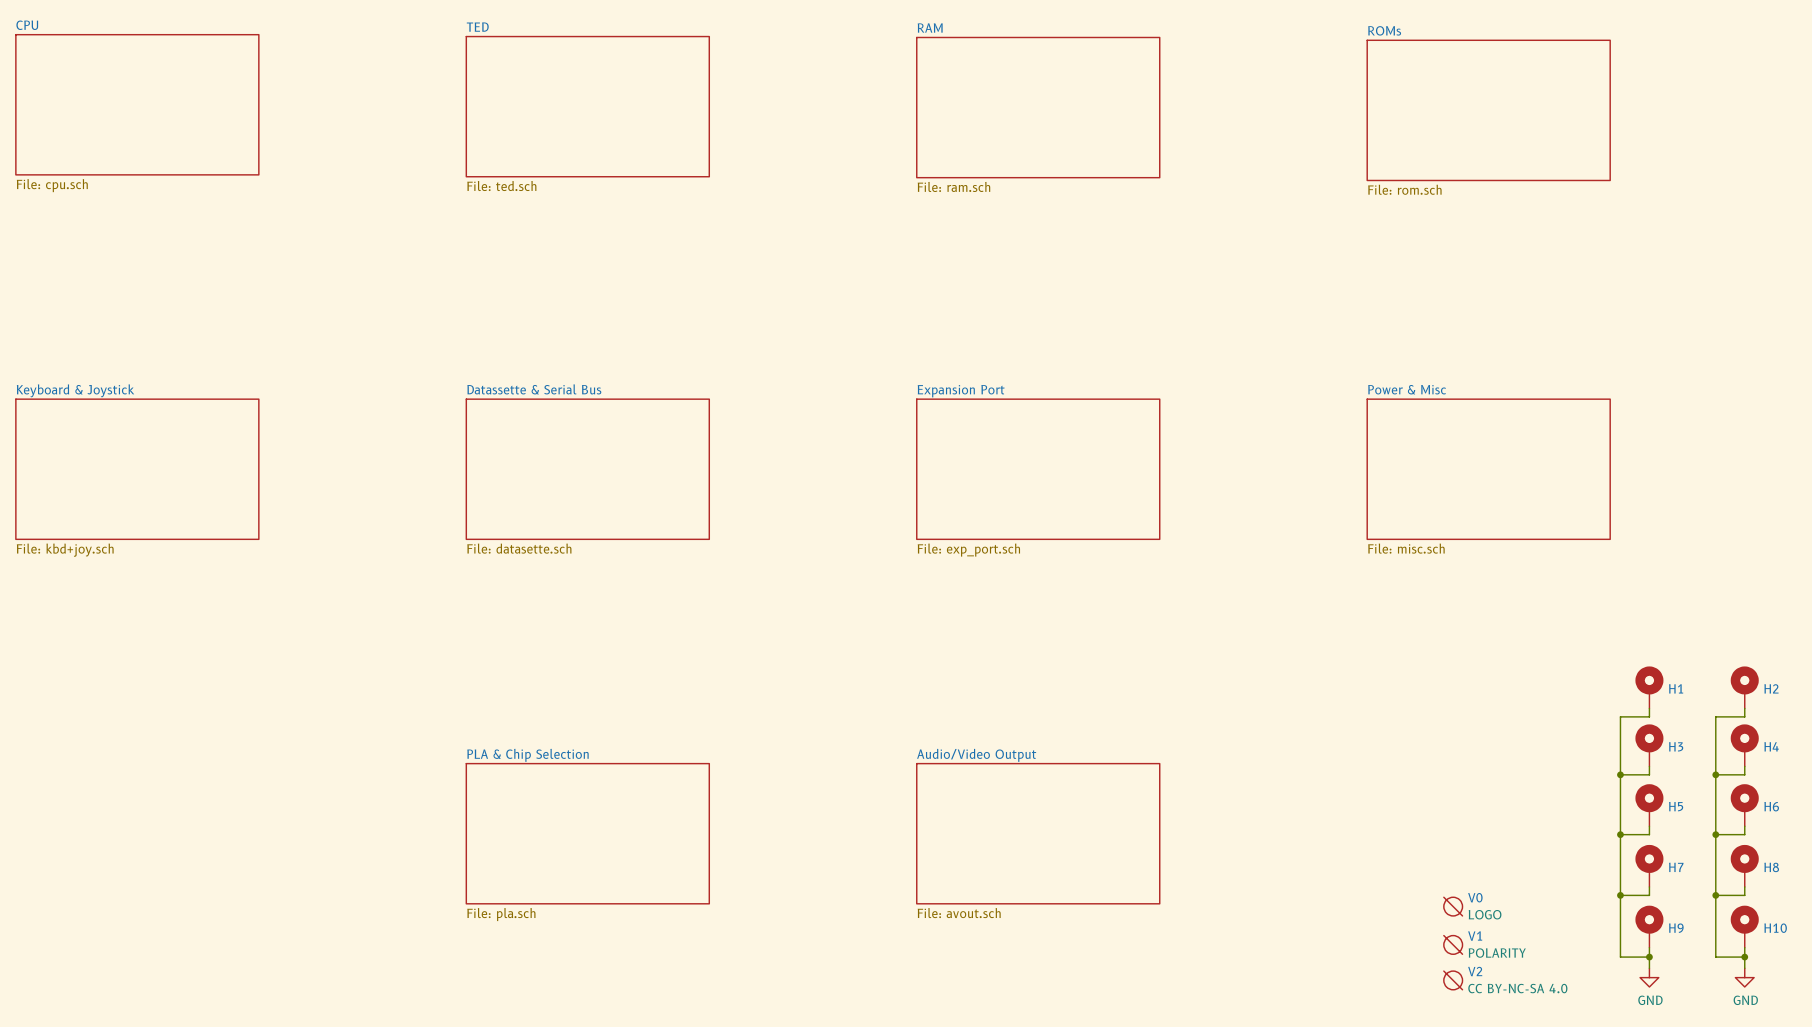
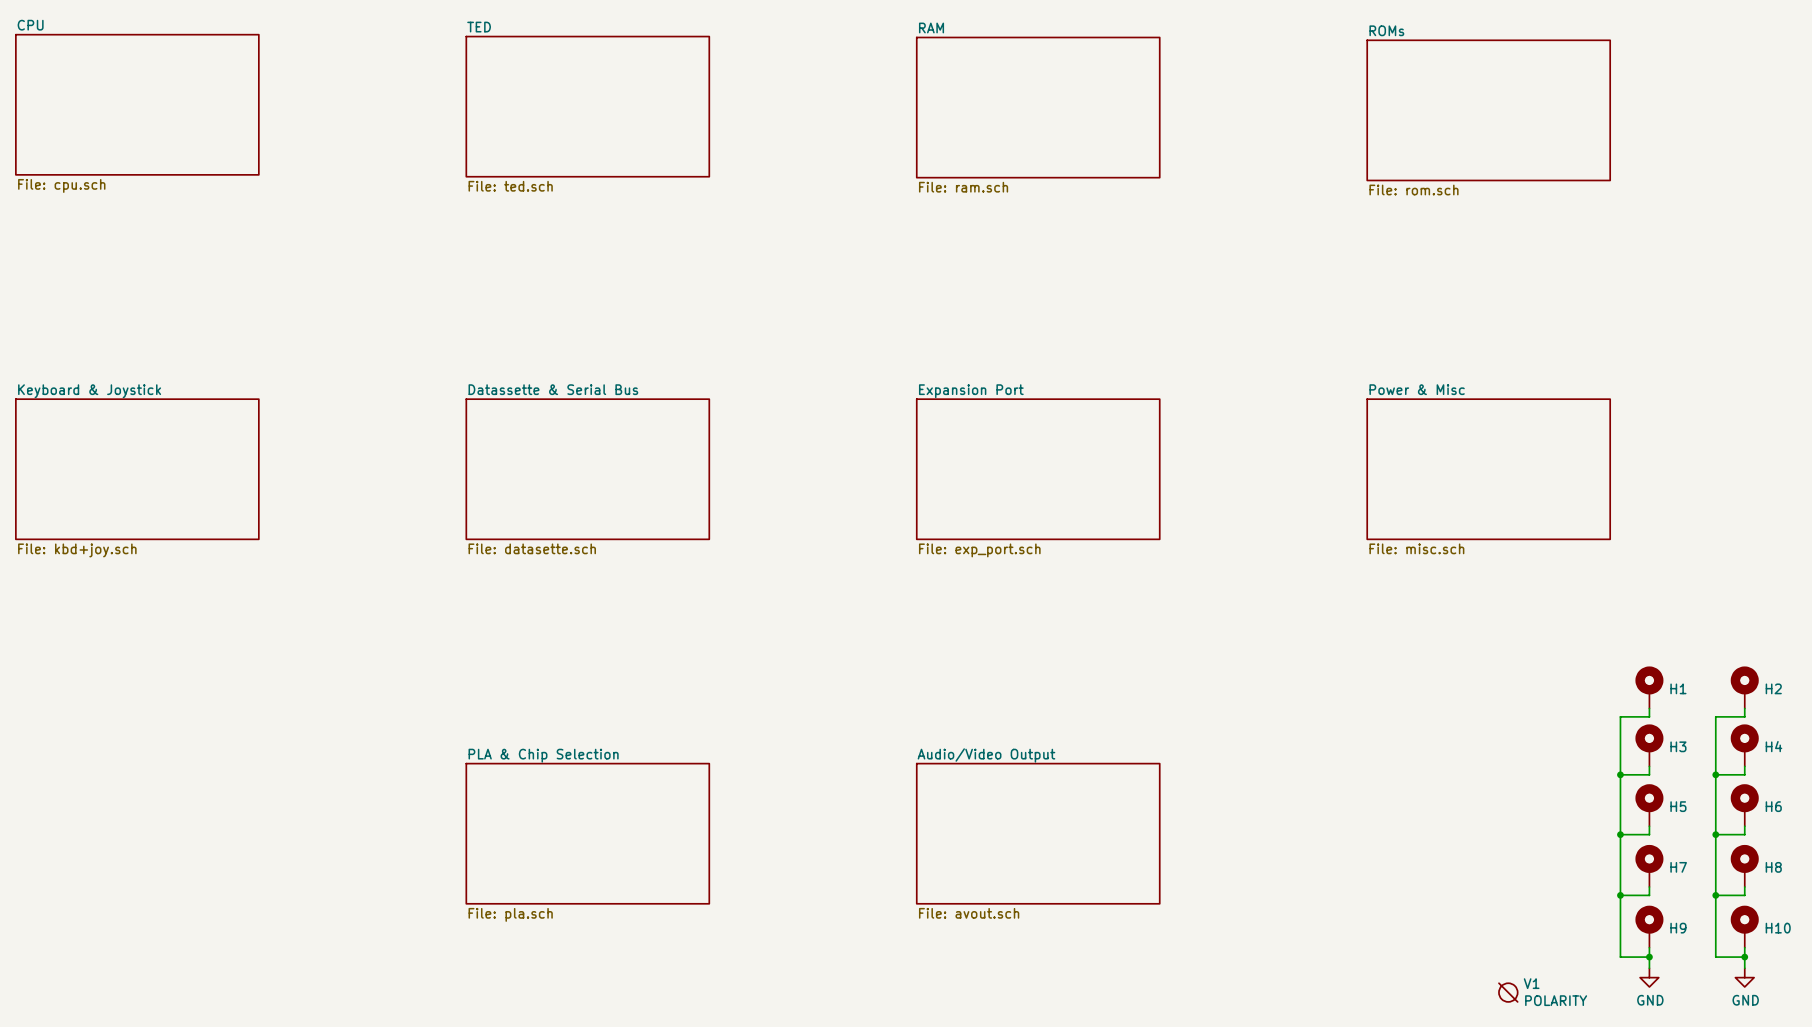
V0: LOGO (1453, 906) -> none
V1 position: (1453, 944) -> (1508, 992)
V2: CC BY-NC-SA 4.0 (1453, 980) -> none

